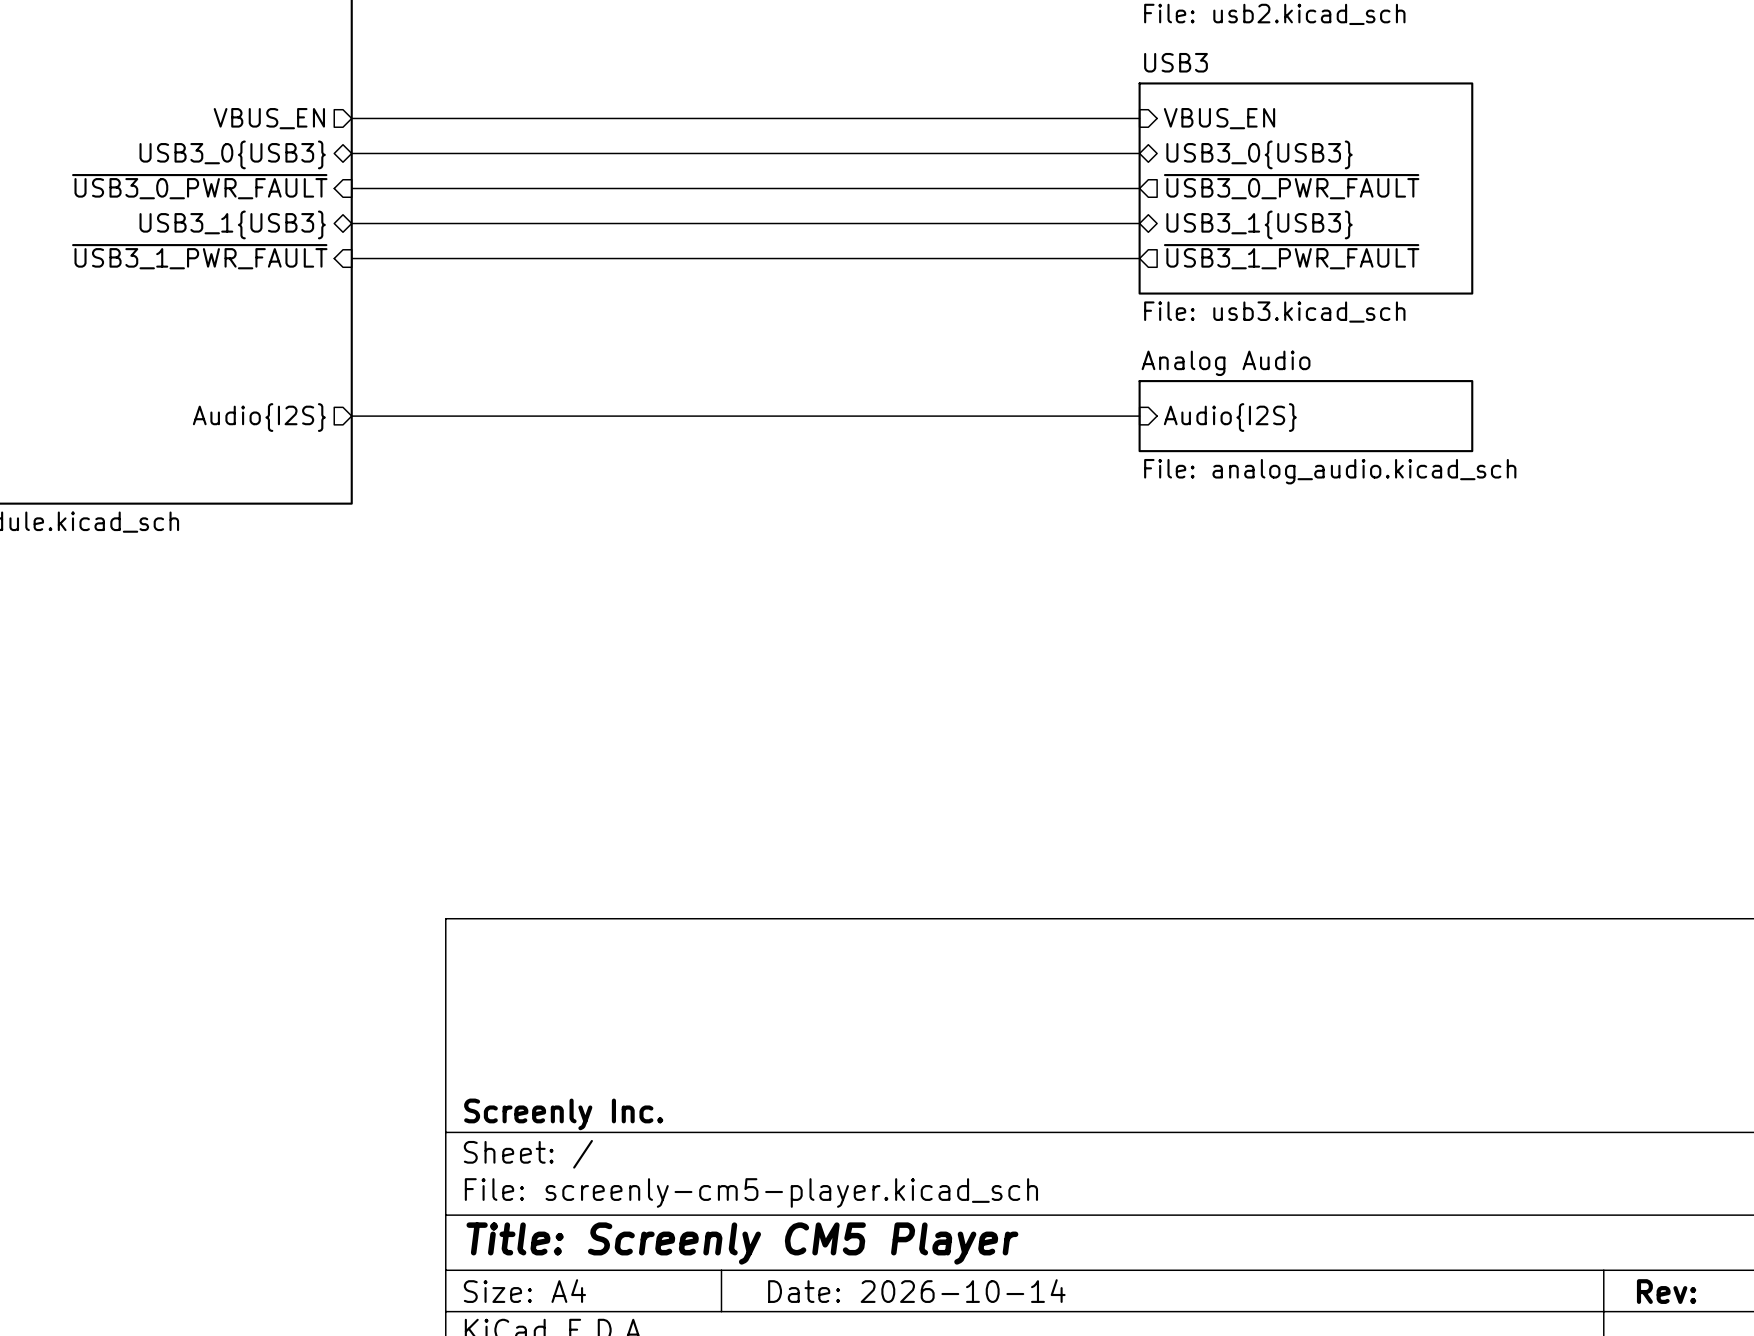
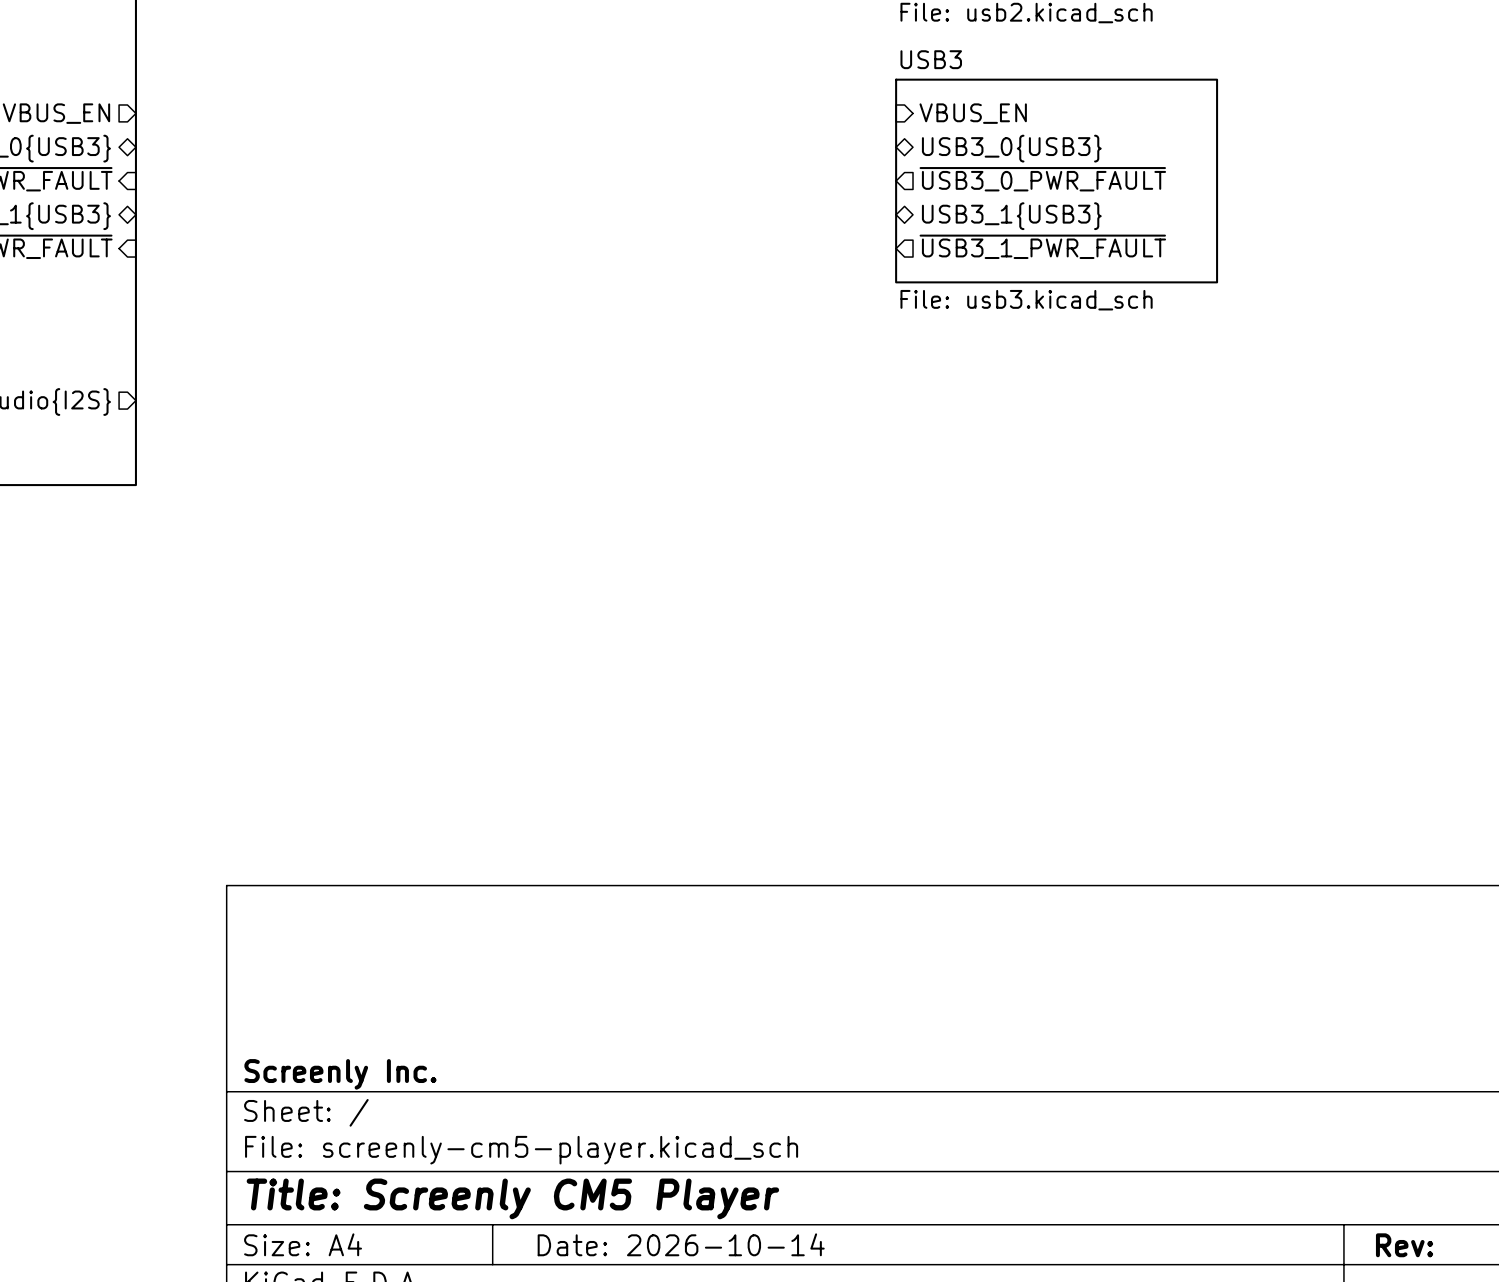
wire: (351, 118) (1139, 118) -> none
bus: (351, 153) (1139, 153) -> none
wire: (351, 188) (1139, 188) -> none
bus: (351, 223) (1139, 223) -> none
wire: (351, 258) (1139, 258) -> none
bus: (351, 416) (1139, 416) -> none
sheet Analog Audio: File: analog_audio.kicad_sch (1305, 416) -> none
sheet pin: Audio{I2S} (1230, 417) -> none

